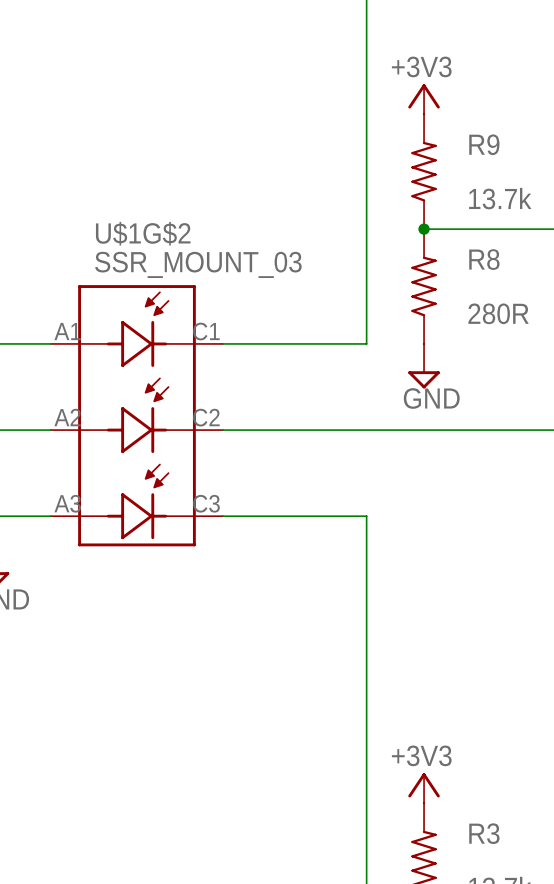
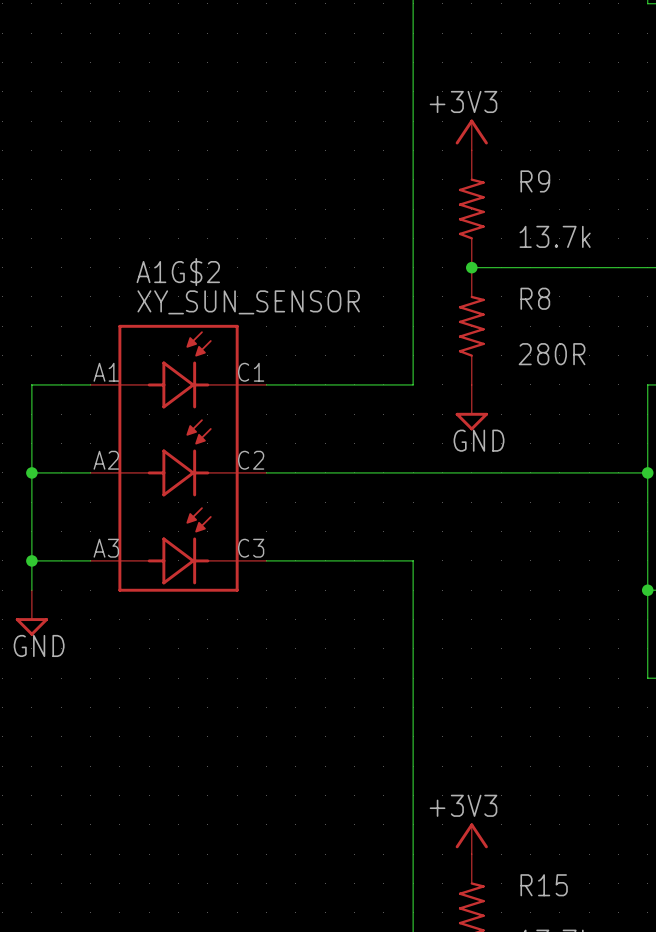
U$1G$2 name: U$1G$2 (143, 233) -> A1G$2 (178, 272)
U$1G$2 value: SSR_MOUNT_03 (198, 264) -> XY_SUN_SENSOR (248, 302)
R3 name: R3 (484, 833) -> R15 (544, 885)

